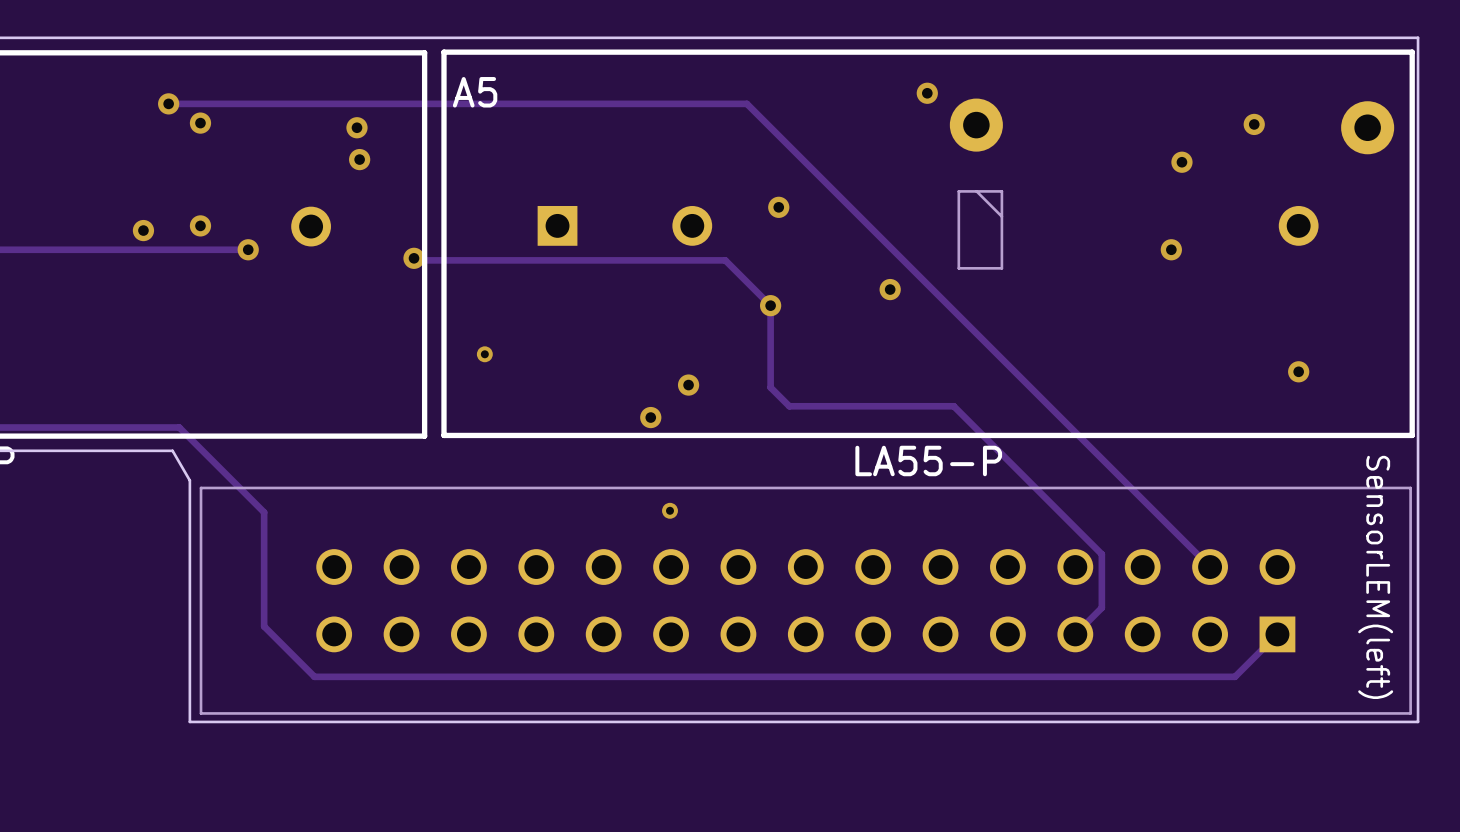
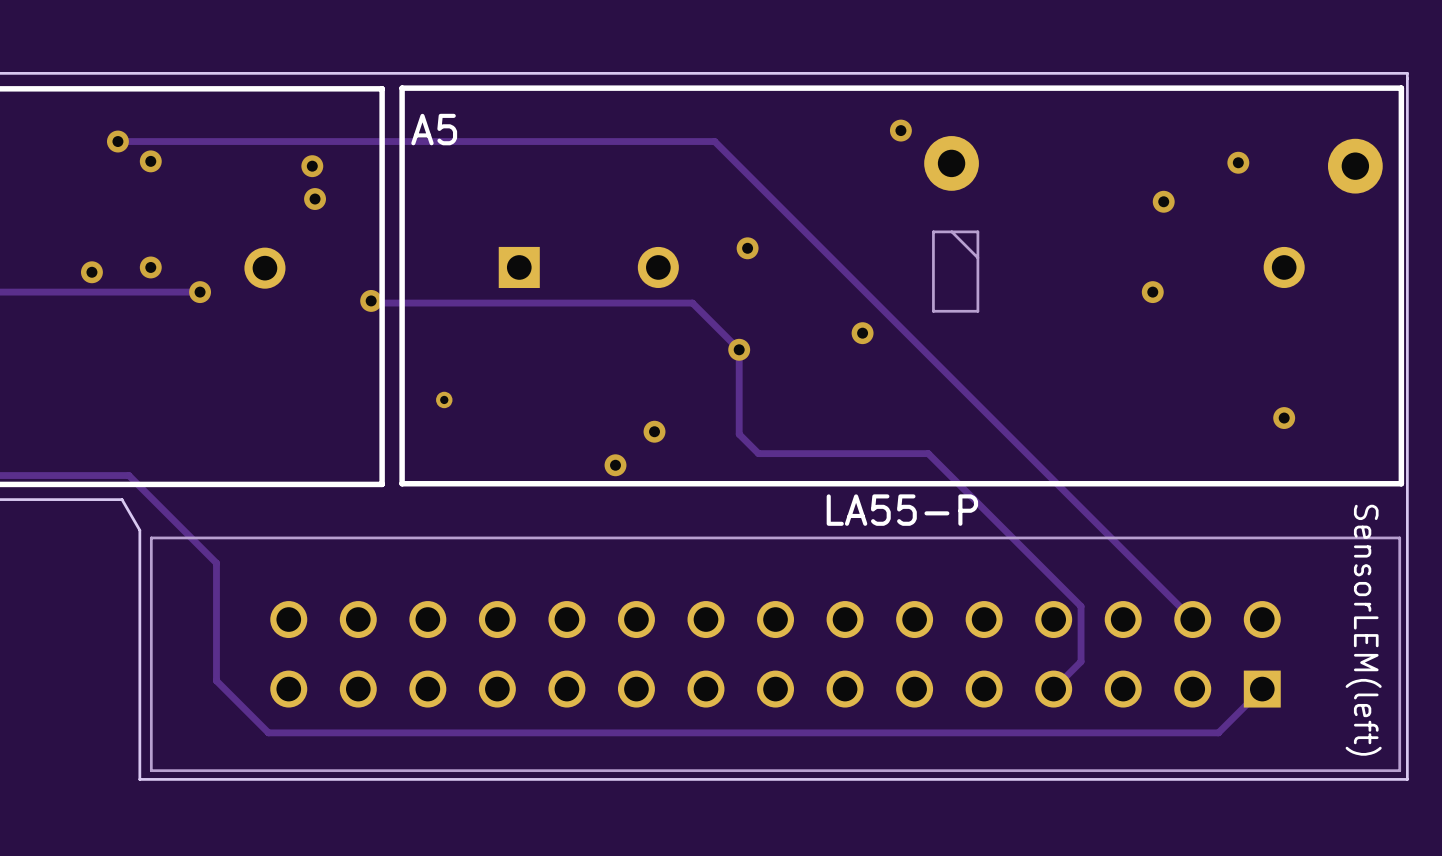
via: (670, 510) -> none

